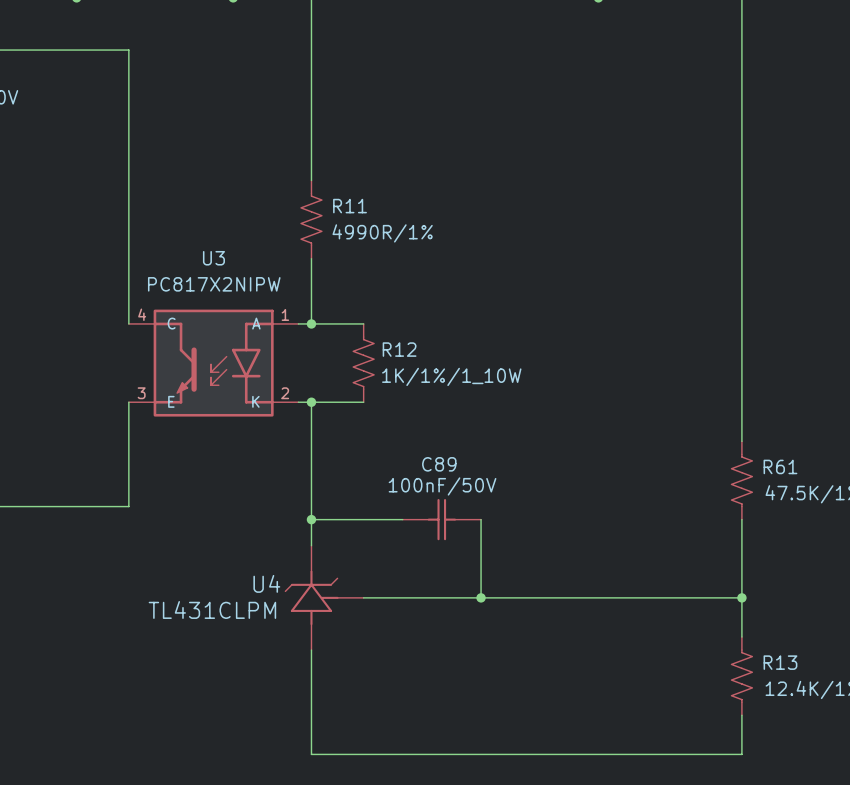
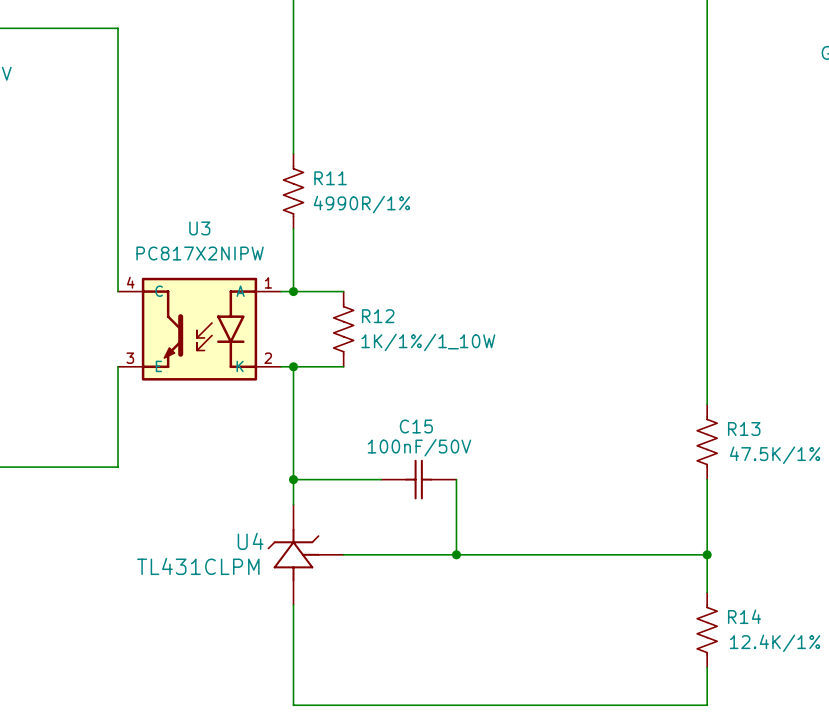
C89 name: C89 (439, 464) -> C15 (416, 426)
R61 name: R61 (780, 466) -> R13 (744, 429)
R13 name: R13 (780, 662) -> R14 (744, 616)

